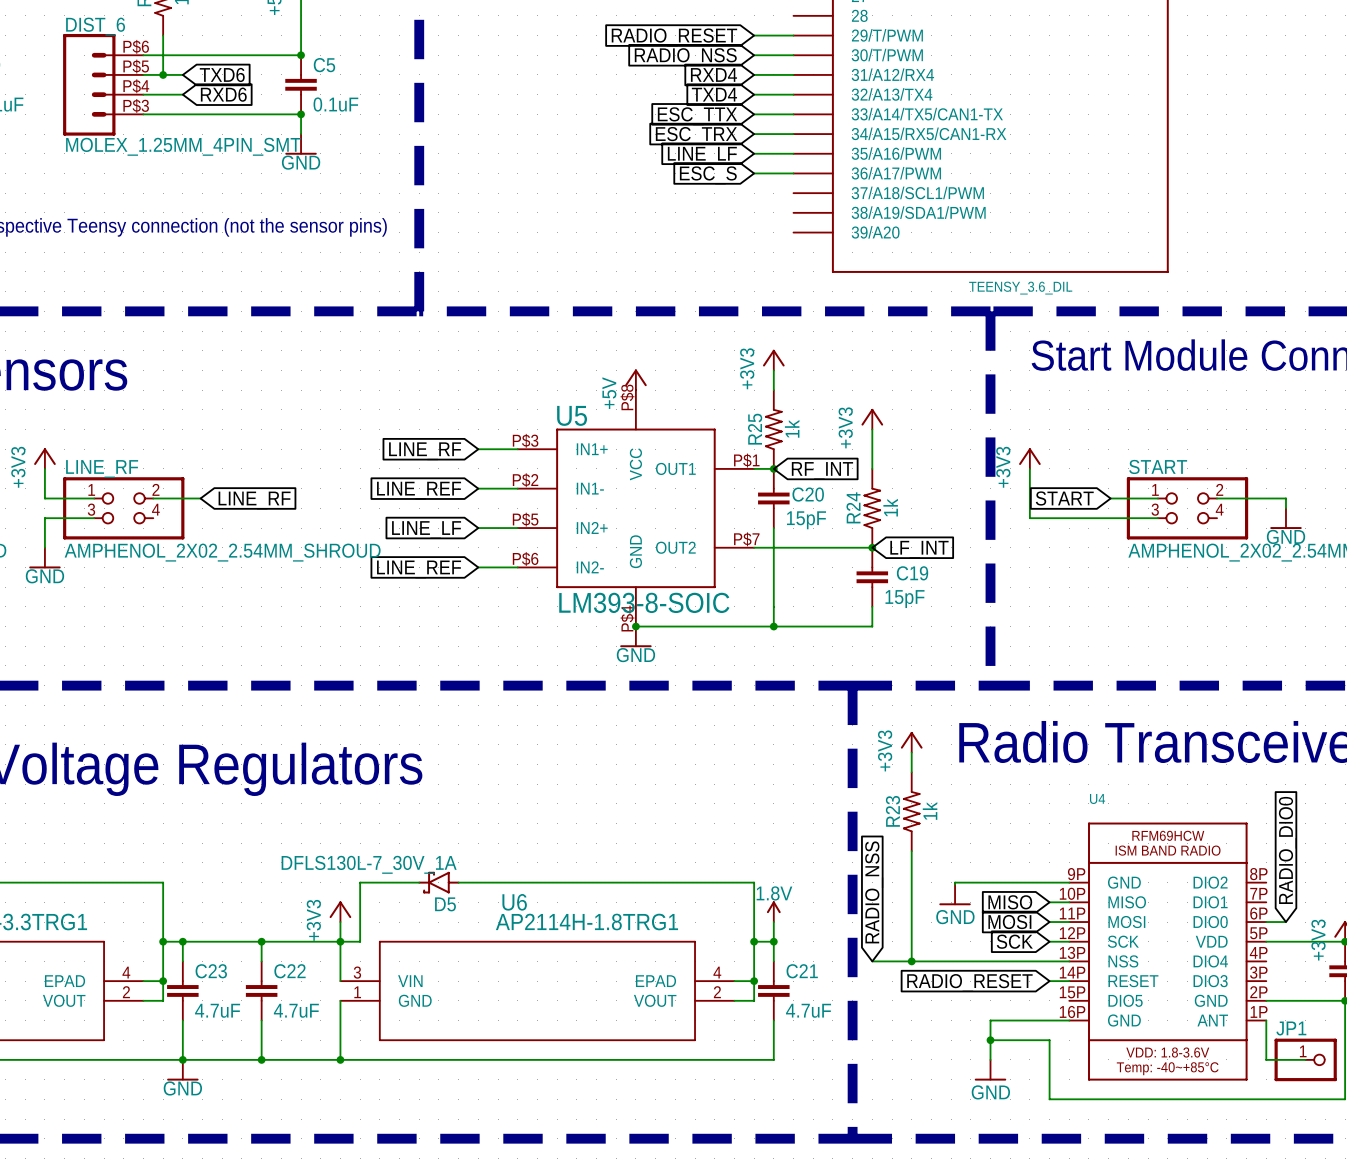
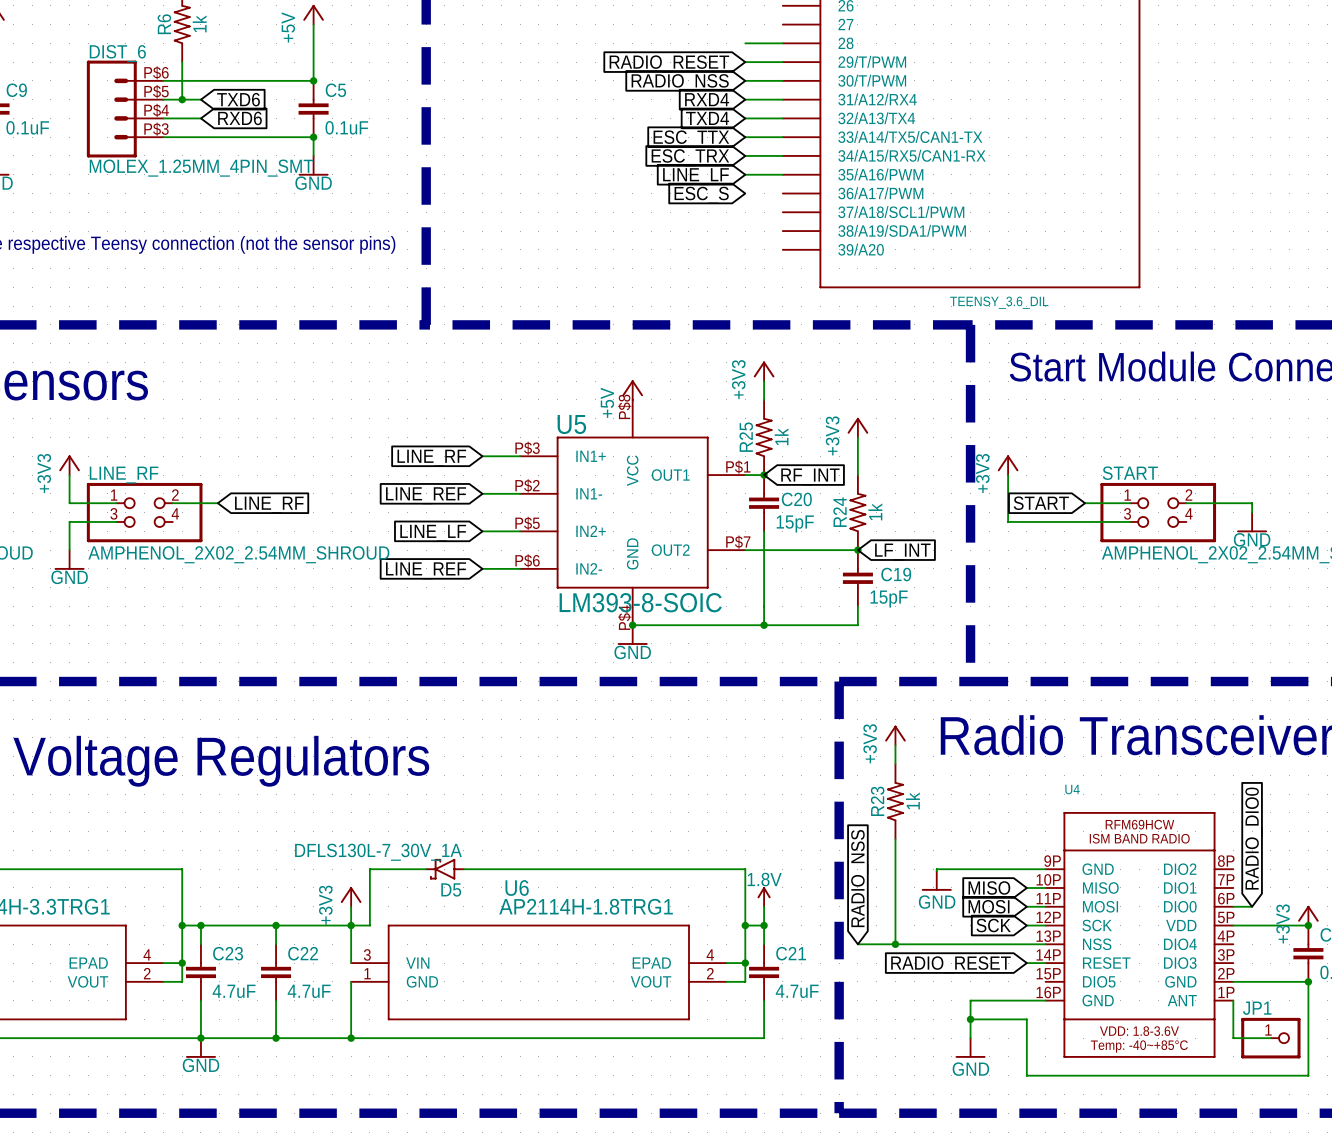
wire: (754, 173) (793, 173) -> (745, 43) (782, 43)

